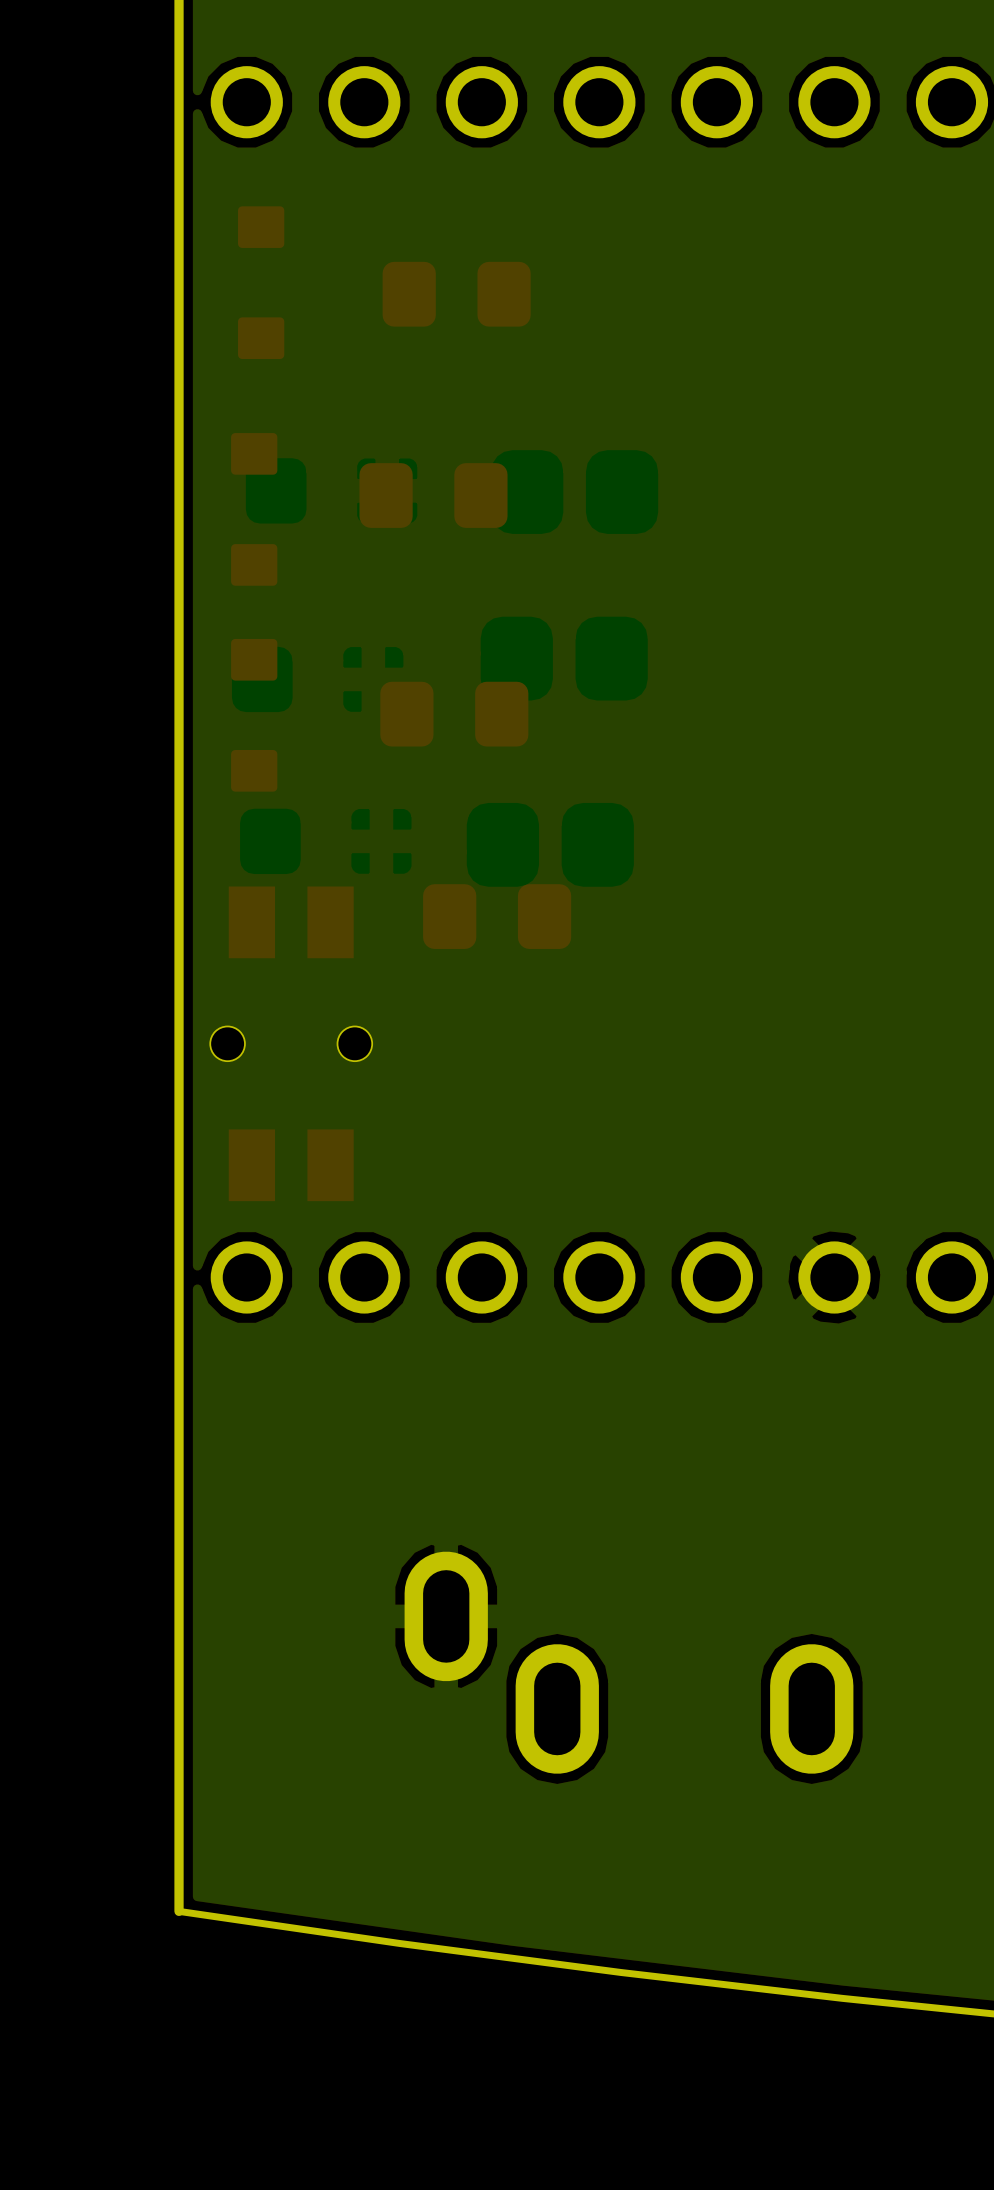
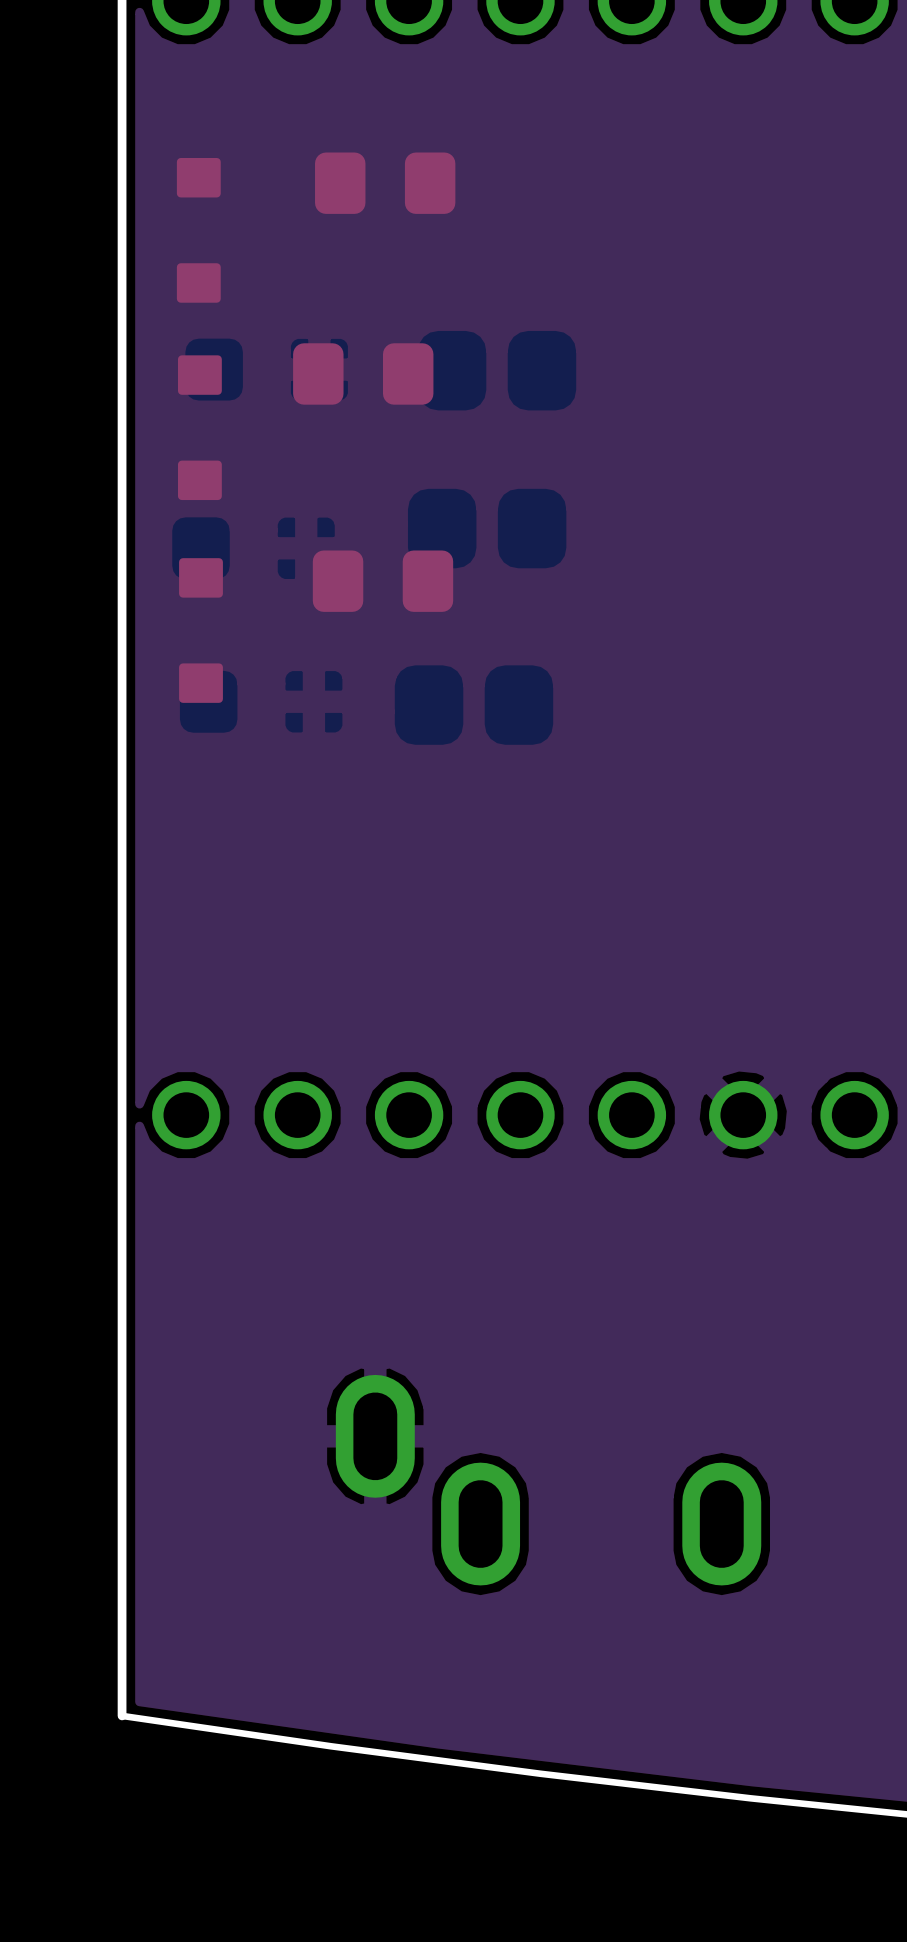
part position: (261, 282) -> (198, 230)
part position: (254, 509) -> (199, 427)
part position: (254, 715) -> (201, 630)
part: (497, 916) -> none
part: (291, 1043) -> none

